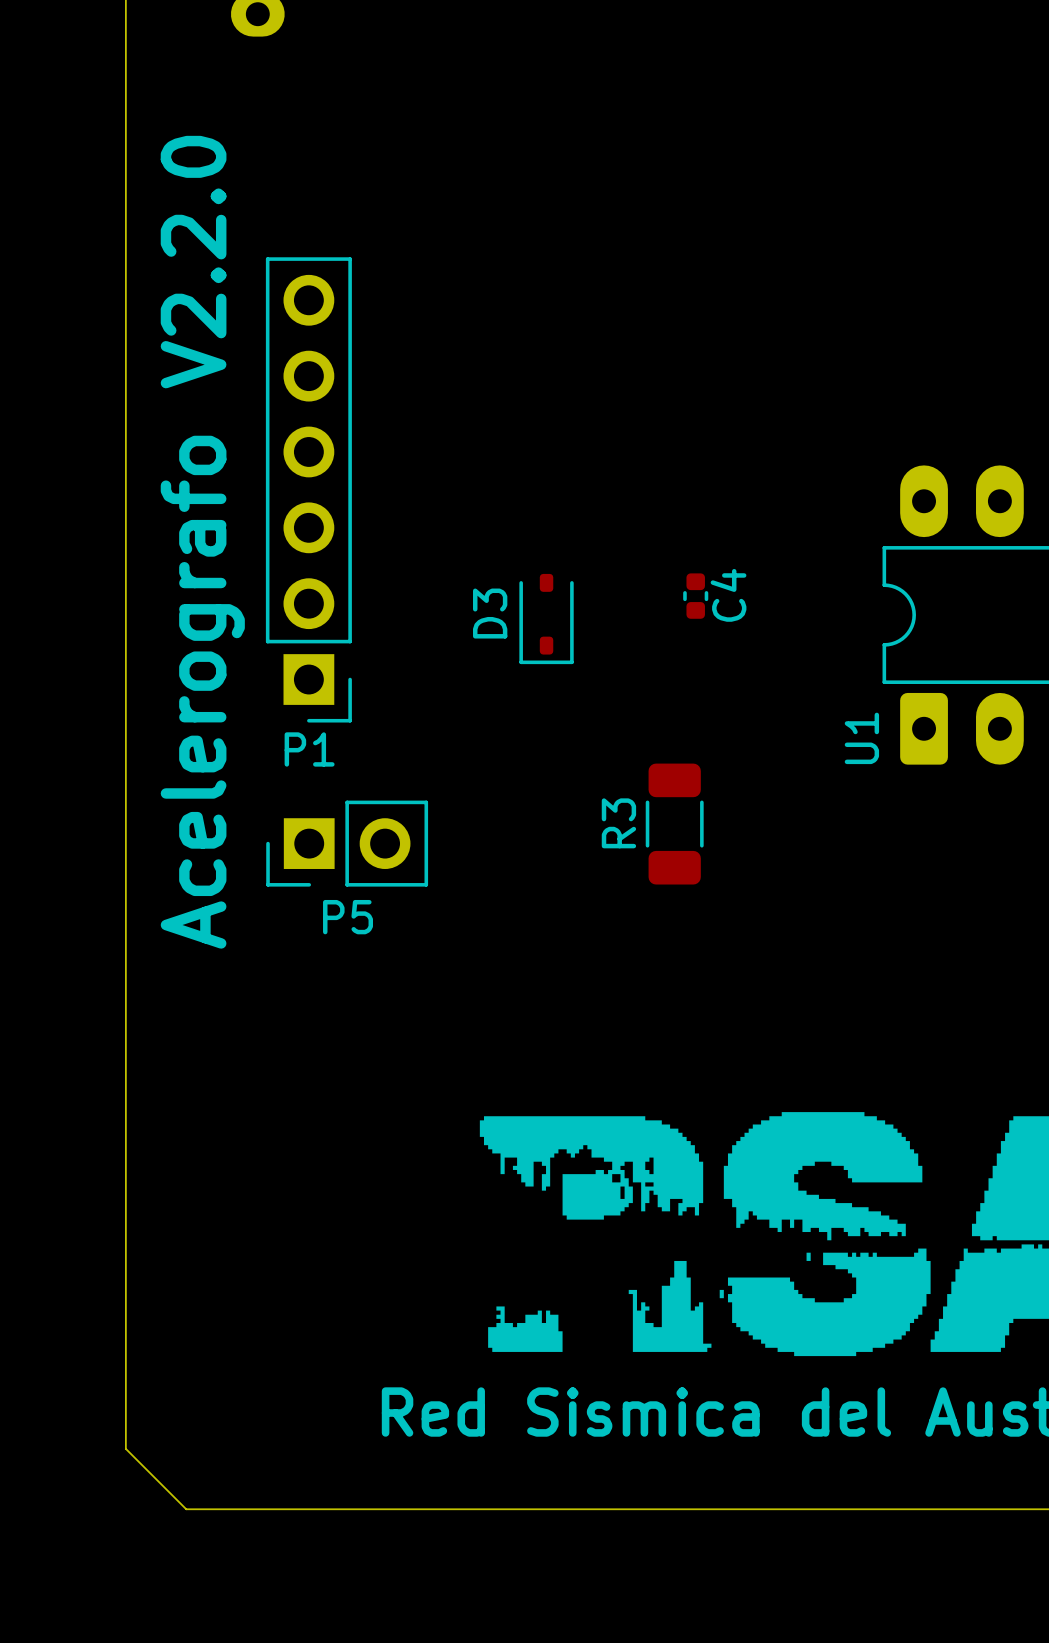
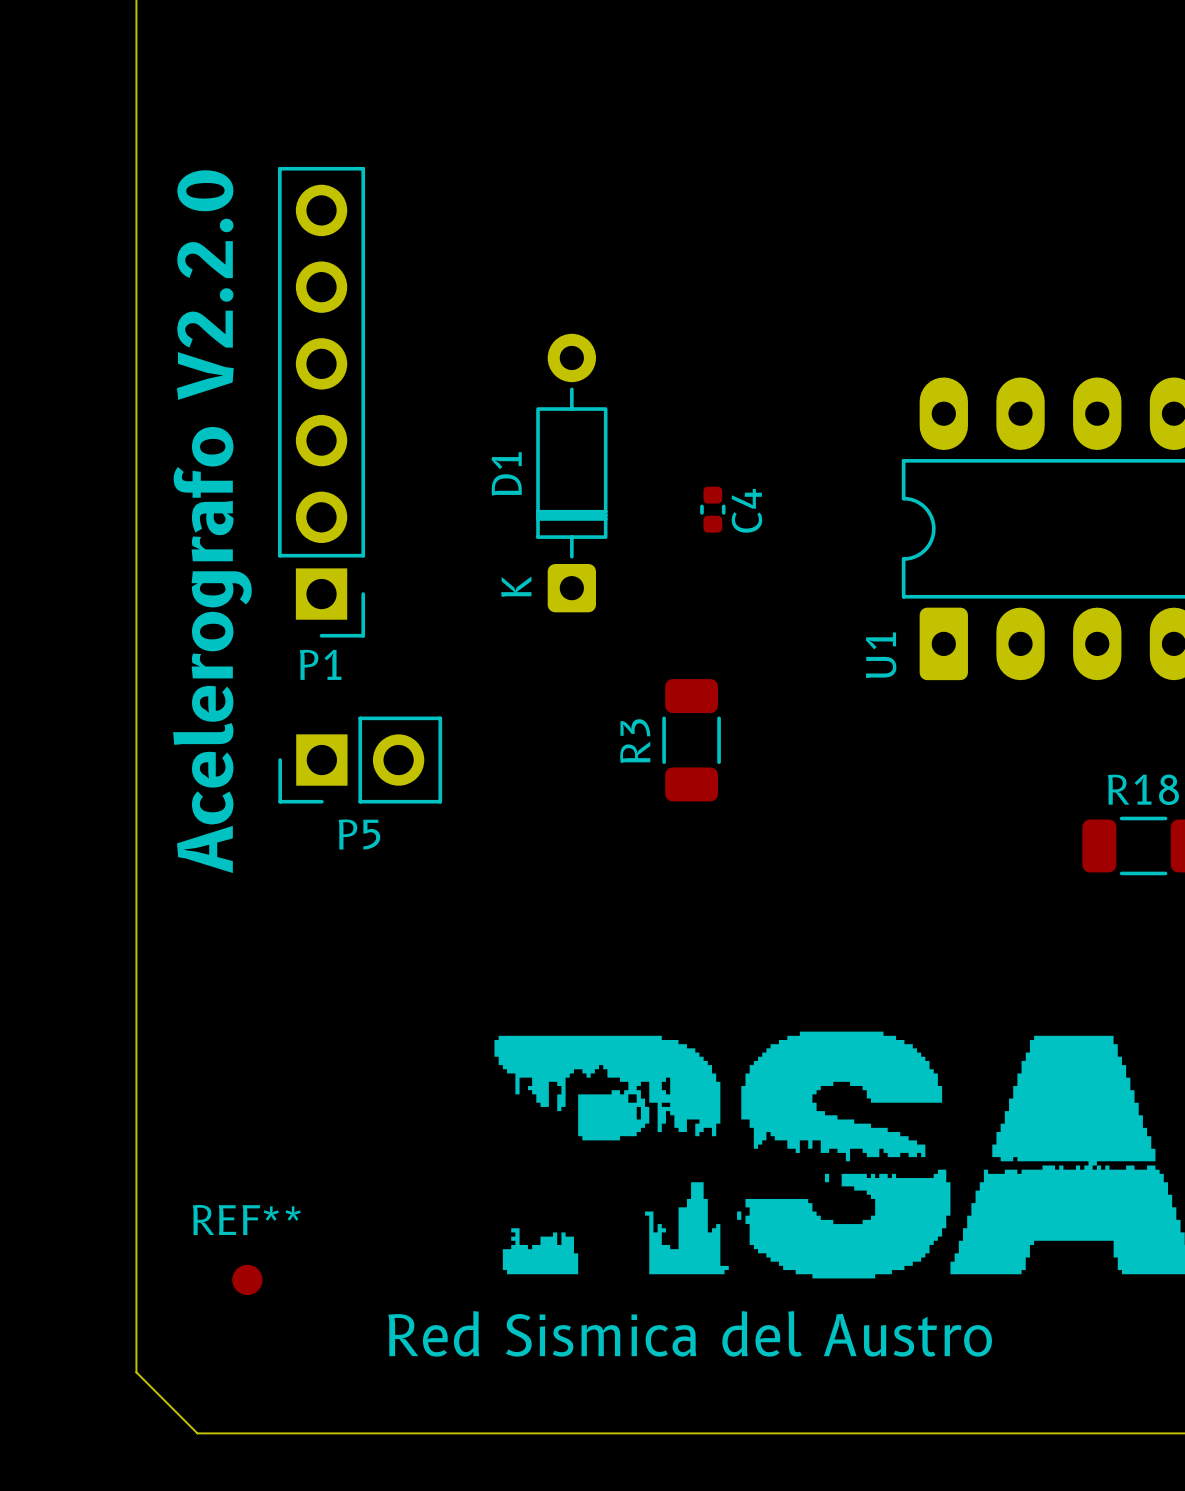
D1: none -> (571, 473)
D3: (546, 619) -> none
REF**: none -> (247, 1279)

